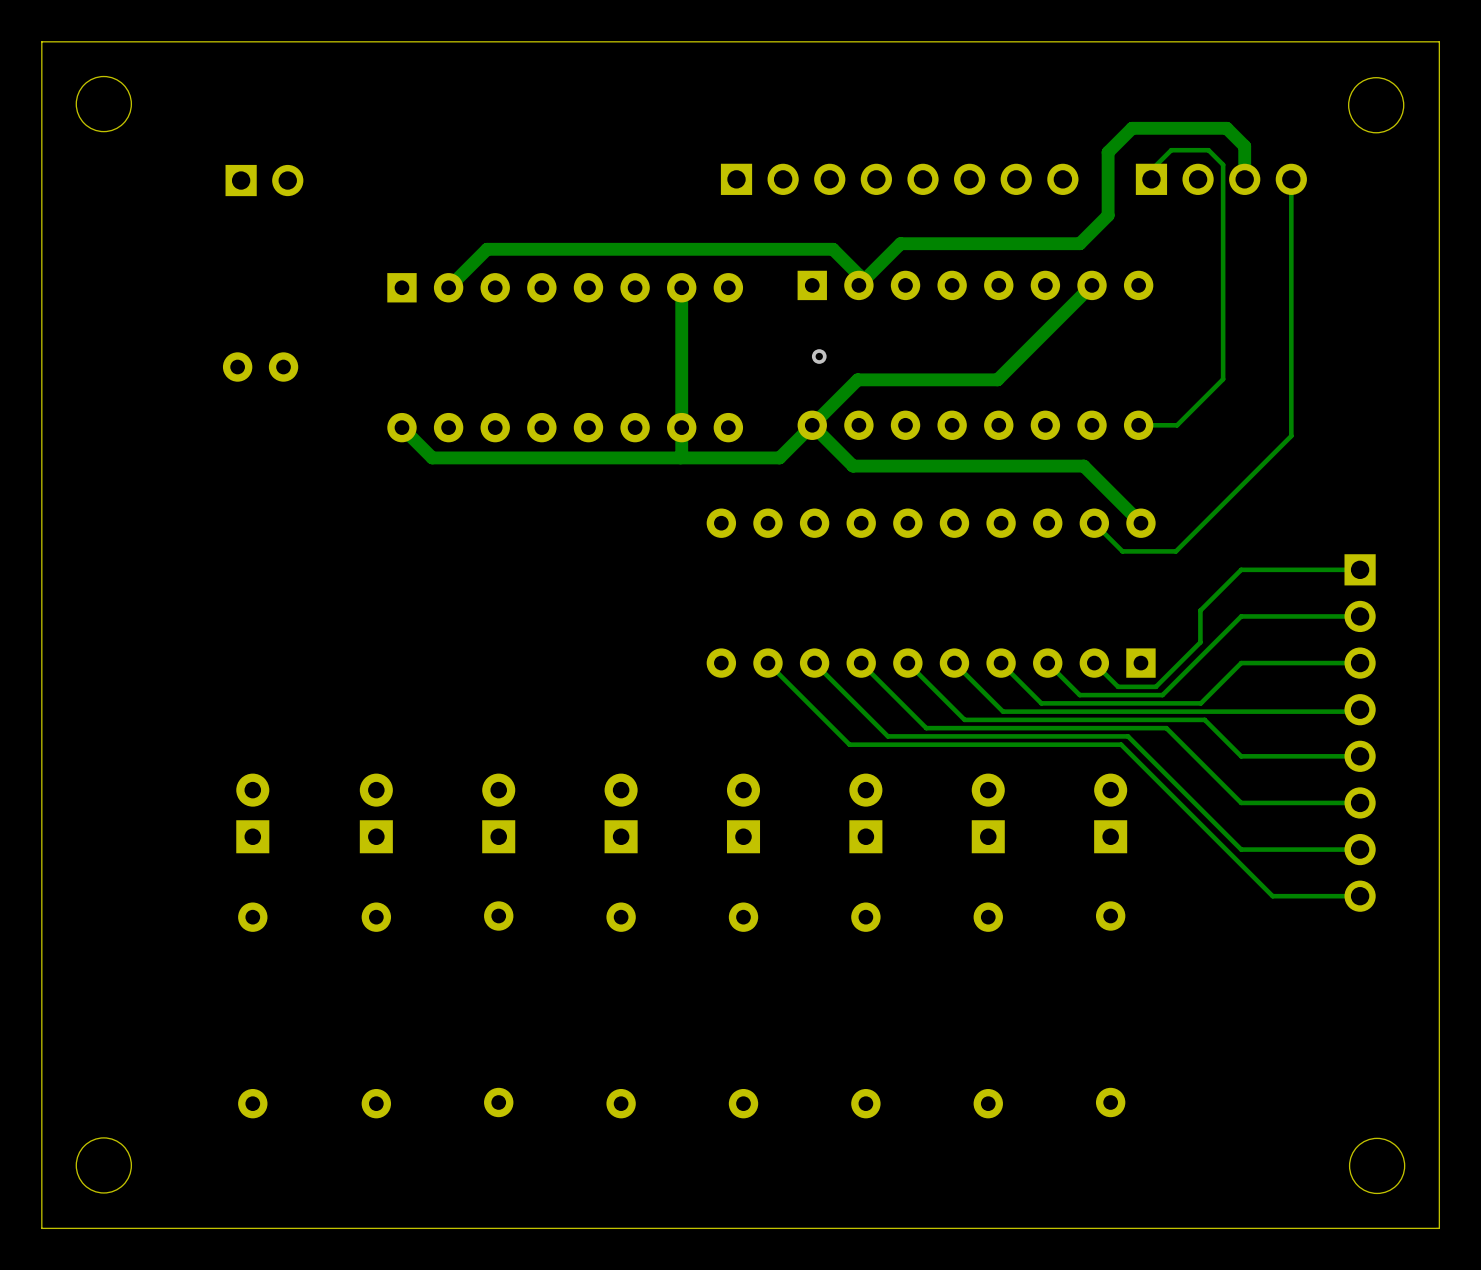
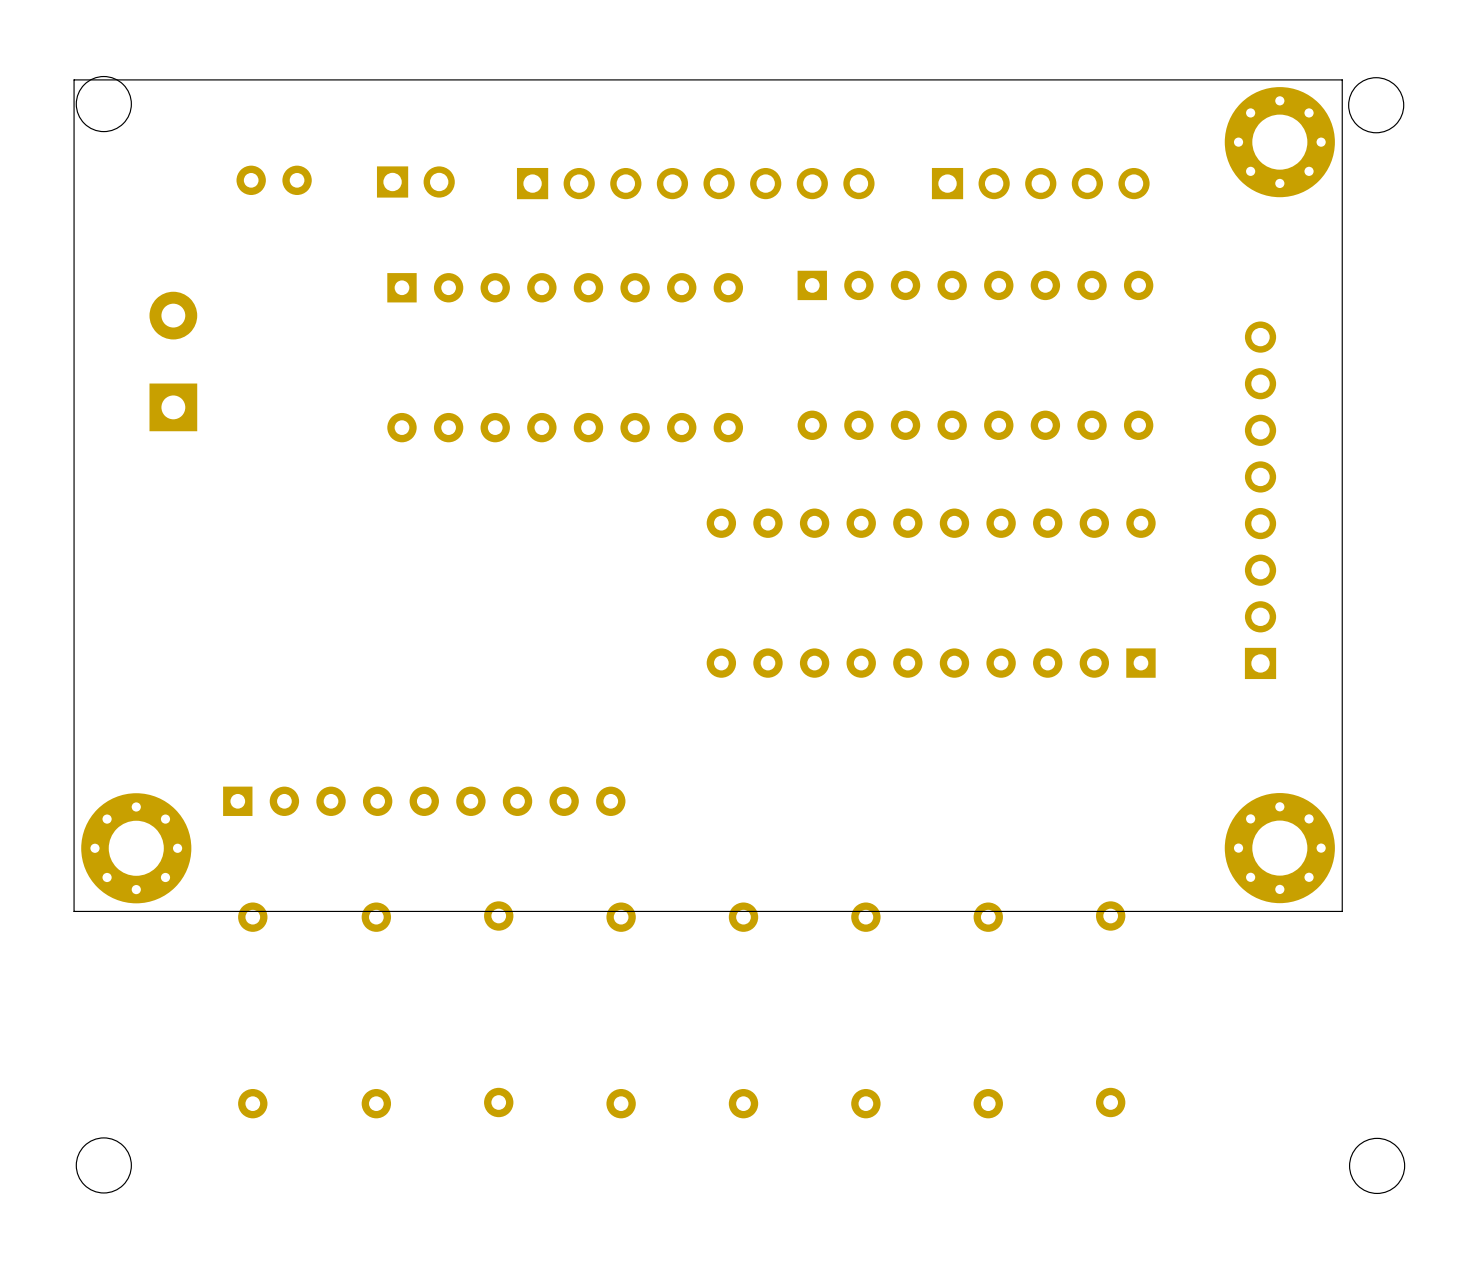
board edge: (1439, 41) (1439, 1228) (41, 1228) (41, 41) (1439, 41) -> (1342, 79) (1342, 911) (74, 911) (74, 79) (1342, 79)
part: none -> (1279, 142)
part footprint: [225, 164, 304, 197] -> [236, 165, 312, 196]
part position: (899, 179) -> (695, 183)
track: (1151, 179) (1151, 170) (1171, 150) (1208, 150) (1223, 164) (1223, 379) (1177, 425) (1138, 425) -> none
part: (1221, 179) -> none
track: (1244, 179) (1244, 146) (1226, 128) (1132, 128) (1108, 152) (1108, 215) (1079, 243) (900, 243) (858, 285) (858, 275) (833, 249) (487, 249) (448, 287) -> none
track: (1291, 179) (1291, 436) (1175, 551) (1122, 551) (1094, 523) -> none
part: none -> (415, 181)
part: none -> (1040, 183)
track: (1092, 285) (997, 379) (857, 379) (779, 457) (432, 457) (401, 427) -> none
track: (681, 287) (680, 457) -> none
via: (819, 356) -> none
part: none -> (173, 361)
part: (260, 367) -> none
track: (812, 425) (853, 466) (1083, 466) (1140, 523) -> none
part: none -> (1260, 500)
track: (1360, 569) (1241, 569) (1200, 610) (1200, 642) (1155, 686) (1118, 686) (1094, 663) -> none
track: (1360, 616) (1241, 616) (1162, 695) (1079, 695) (1047, 663) -> none
track: (767, 663) (849, 744) (1121, 744) (1272, 896) (1360, 896) -> none
track: (814, 663) (887, 736) (1128, 736) (1241, 849) (1360, 849) -> none
track: (861, 663) (926, 728) (1166, 728) (1241, 802) (1360, 802) -> none
track: (907, 663) (964, 719) (1204, 719) (1241, 756) (1360, 756) -> none
track: (954, 663) (1003, 711) (1358, 711) (1360, 709) -> none
track: (1360, 663) (1241, 663) (1200, 703) (1041, 703) (1001, 663) -> none
part: (1360, 733) -> none
part: none -> (424, 801)
part: (252, 813) -> none
part: (376, 813) -> none
part: (498, 813) -> none
part: (621, 813) -> none
part: (743, 813) -> none
part: (865, 813) -> none
part: (988, 813) -> none
part: (1110, 813) -> none
part: none -> (136, 848)
part: none -> (1279, 848)

